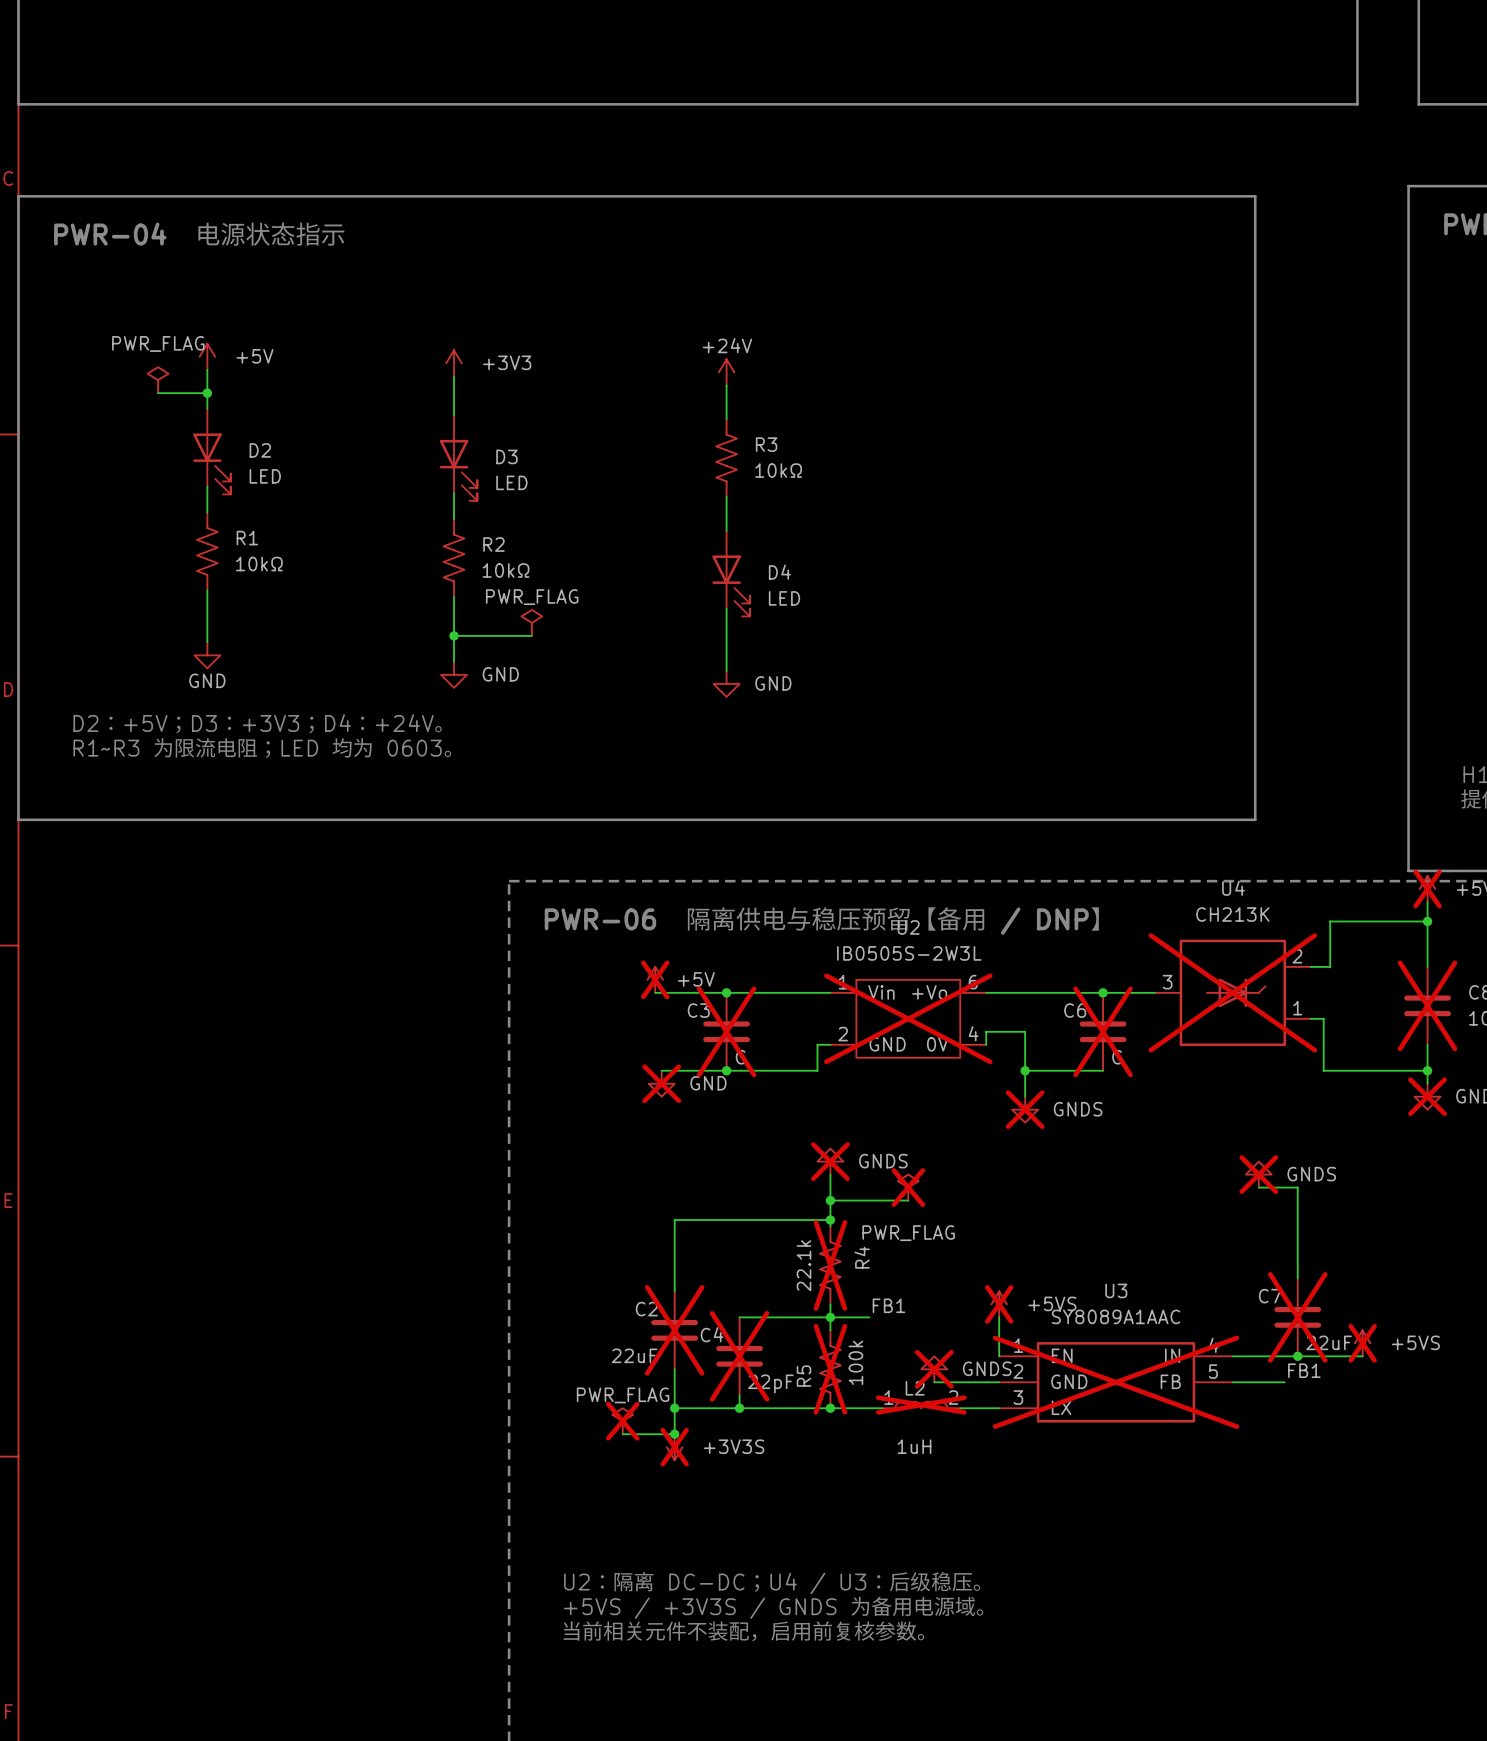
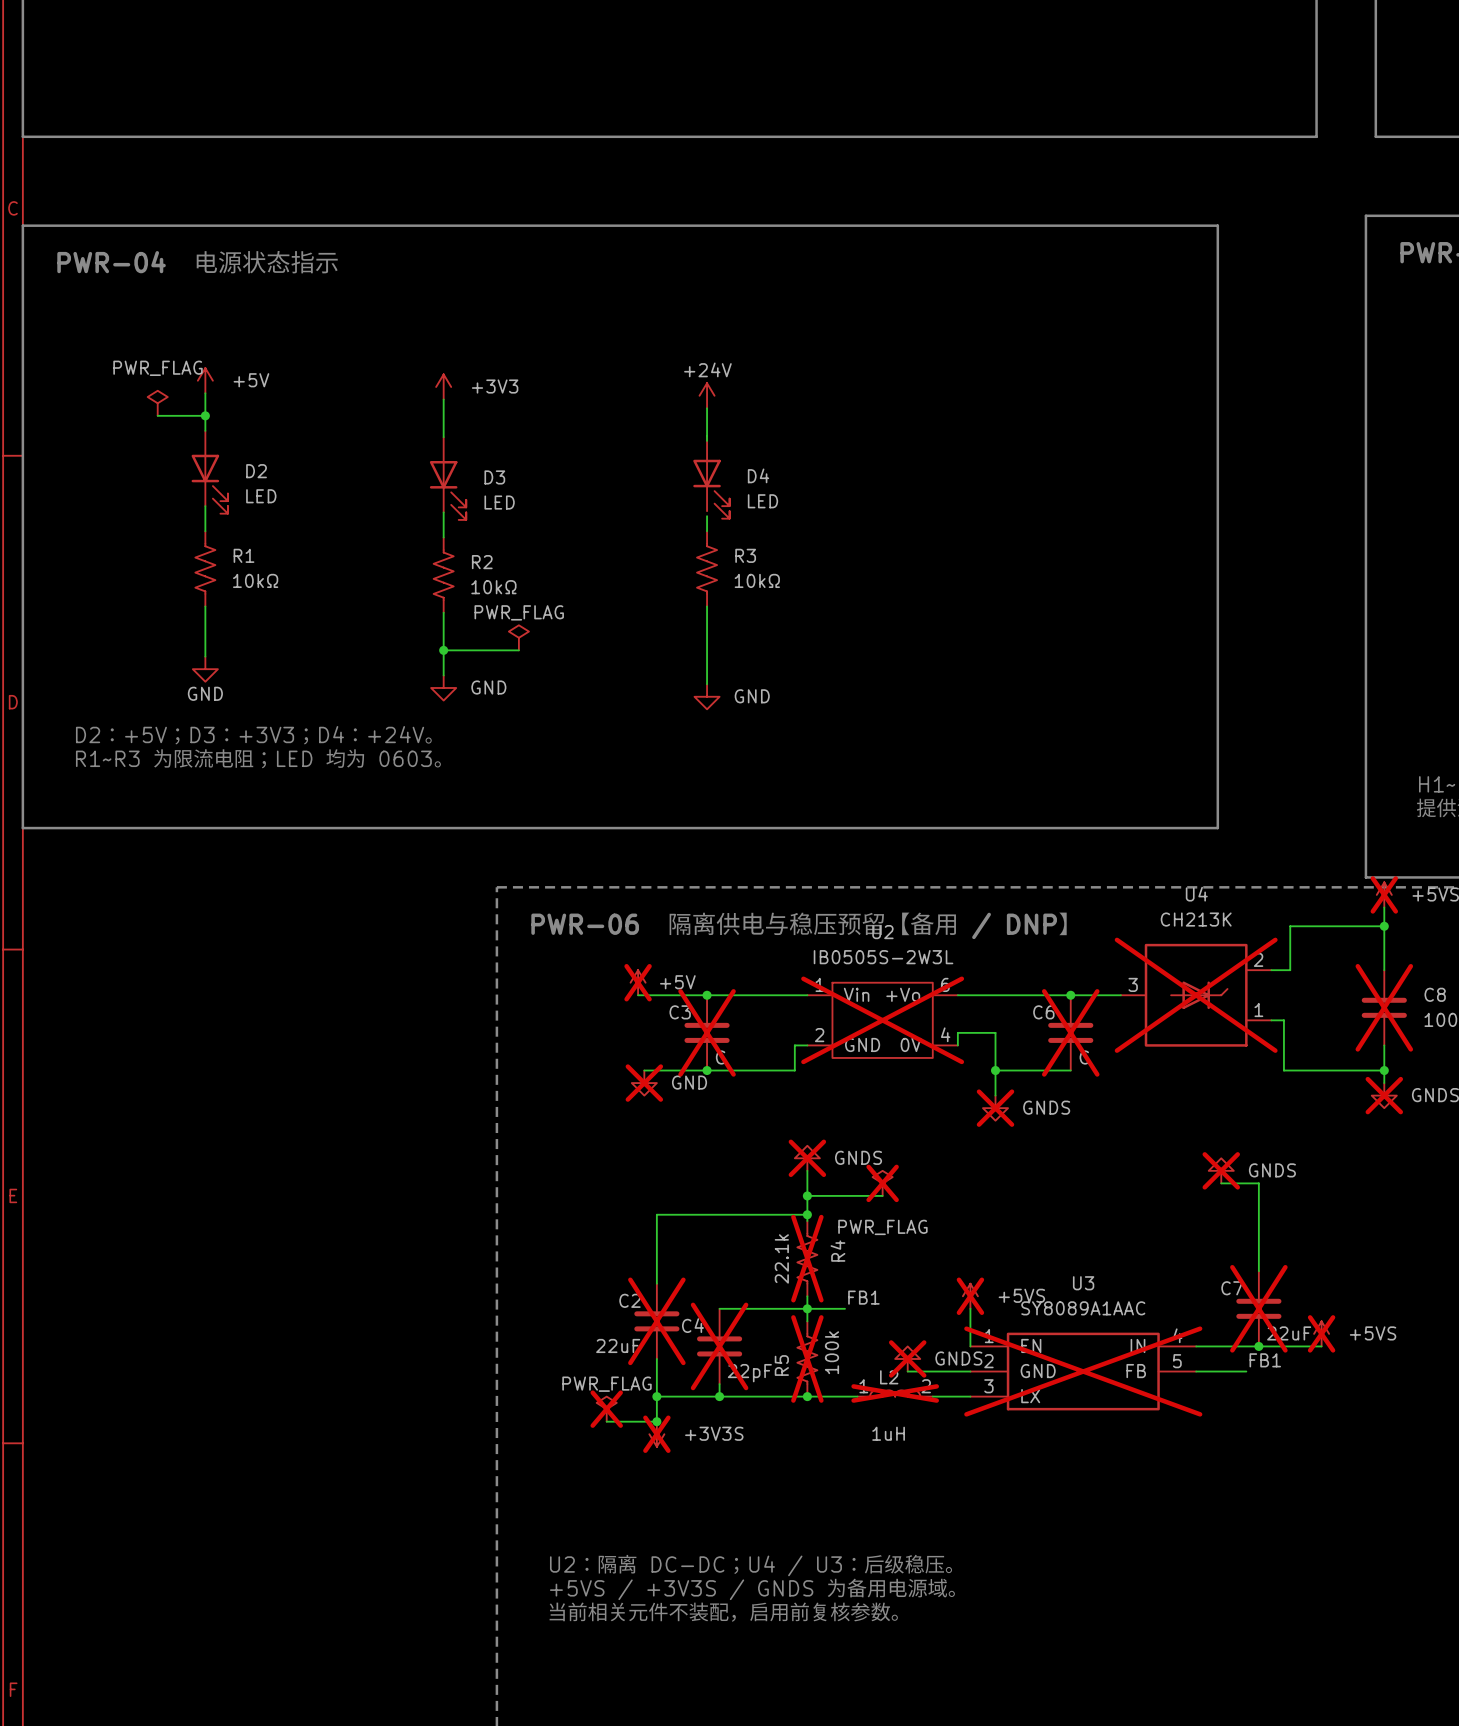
R3 position: (726, 458) -> (707, 568)
D4 position: (731, 573) -> (711, 477)

